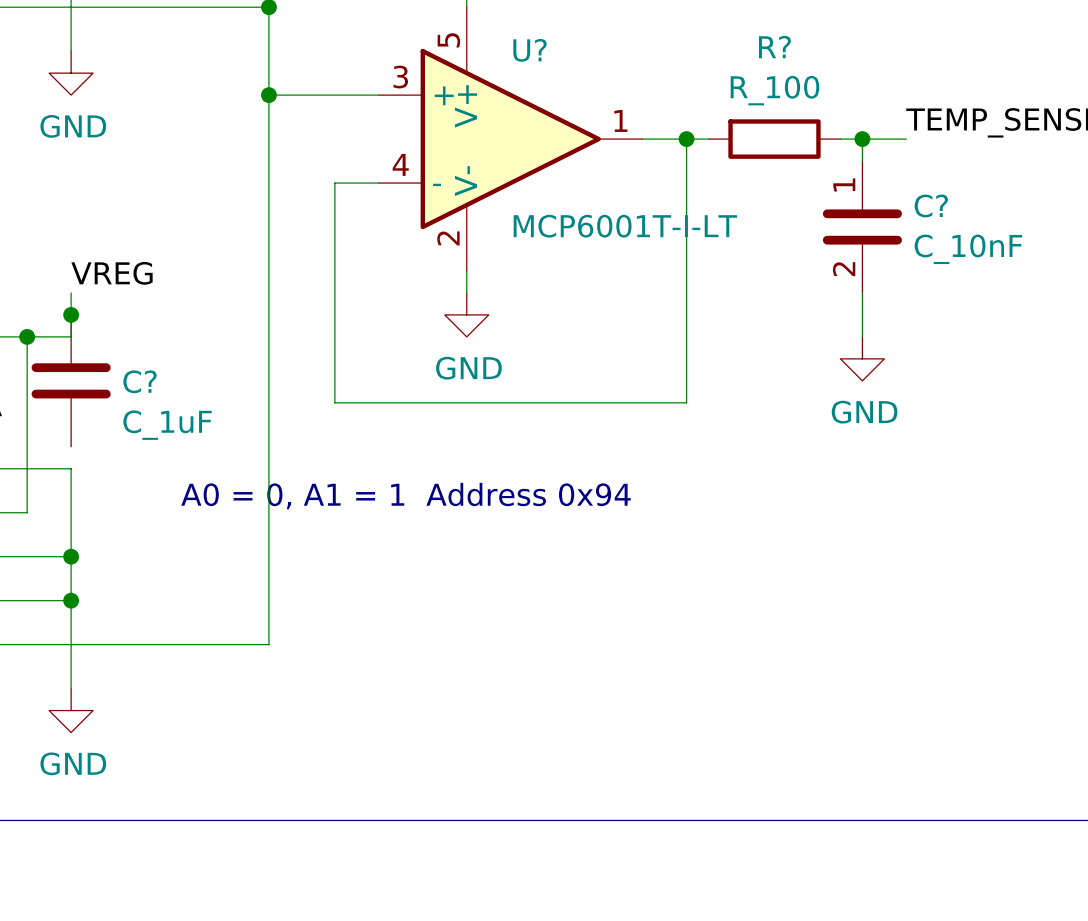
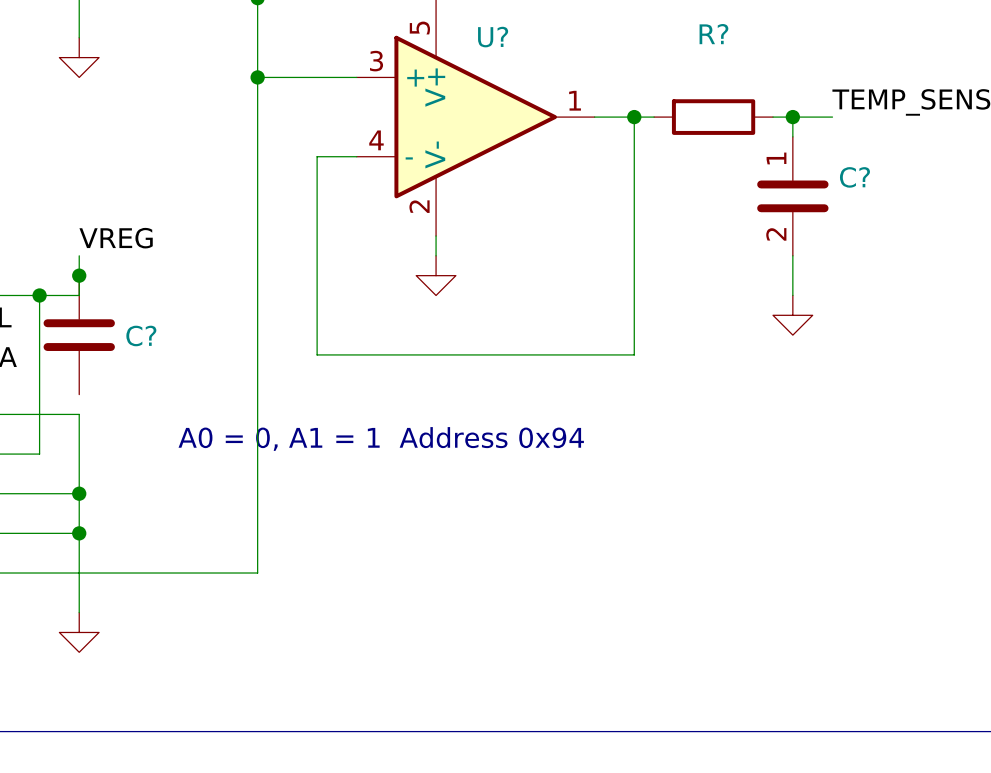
R? value: R_100 (774, 90) -> none
power symbol text: GND (73, 126) -> none
U? value: MCP6001T-I-LT (625, 226) -> none
C? value: C_10nF (968, 249) -> none
power symbol text: GND (468, 368) -> none
power symbol text: GND (864, 412) -> none
C? value: C_1uF (167, 425) -> none
power symbol text: GND (73, 763) -> none

